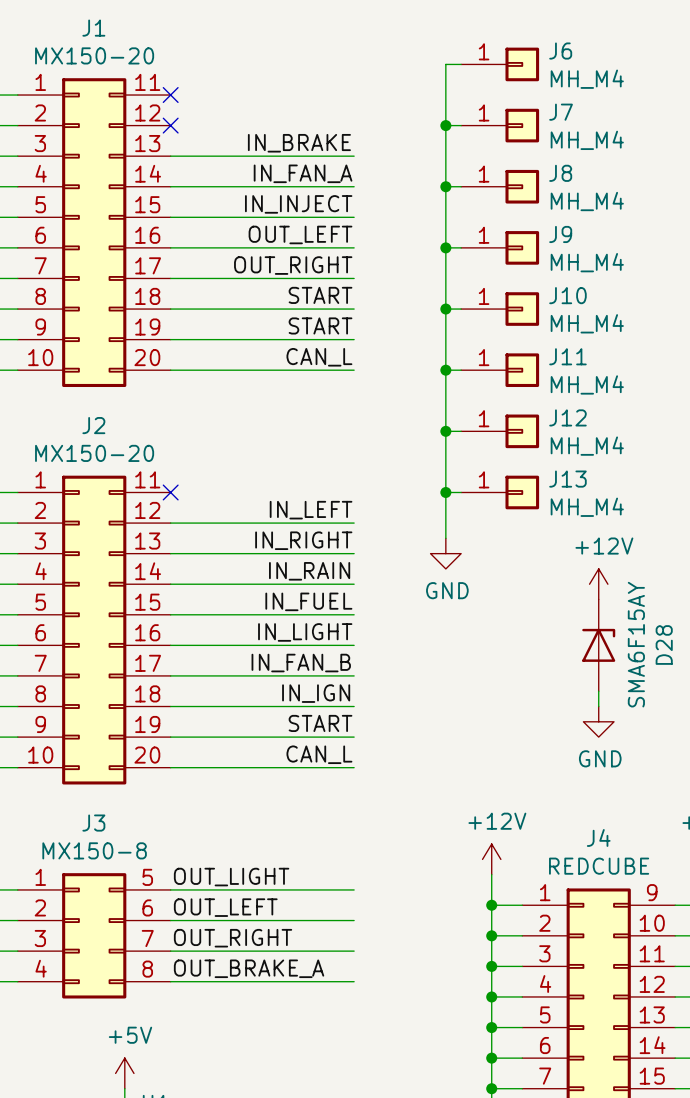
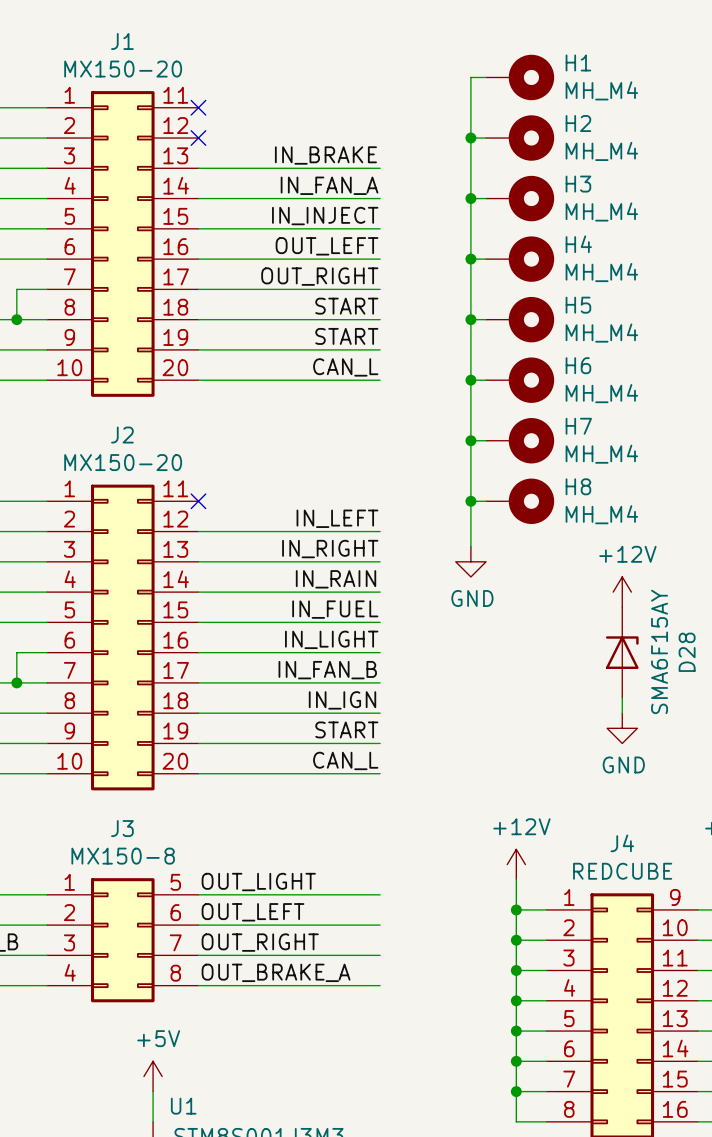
H1: none -> MH_M4 (520, 77)
J6: MH_M4 (500, 64) -> none
H2: none -> MH_M4 (520, 138)
J7: MH_M4 (500, 125) -> none
H3: none -> MH_M4 (520, 198)
J8: MH_M4 (500, 186) -> none
H4: none -> MH_M4 (520, 259)
J9: MH_M4 (500, 247) -> none
H5: none -> MH_M4 (520, 319)
J10: MH_M4 (500, 309) -> none
H6: none -> MH_M4 (520, 380)
J11: MH_M4 (500, 370) -> none
H7: none -> MH_M4 (520, 440)
J12: MH_M4 (500, 431) -> none
H8: none -> MH_M4 (520, 501)
J13: MH_M4 (500, 492) -> none

